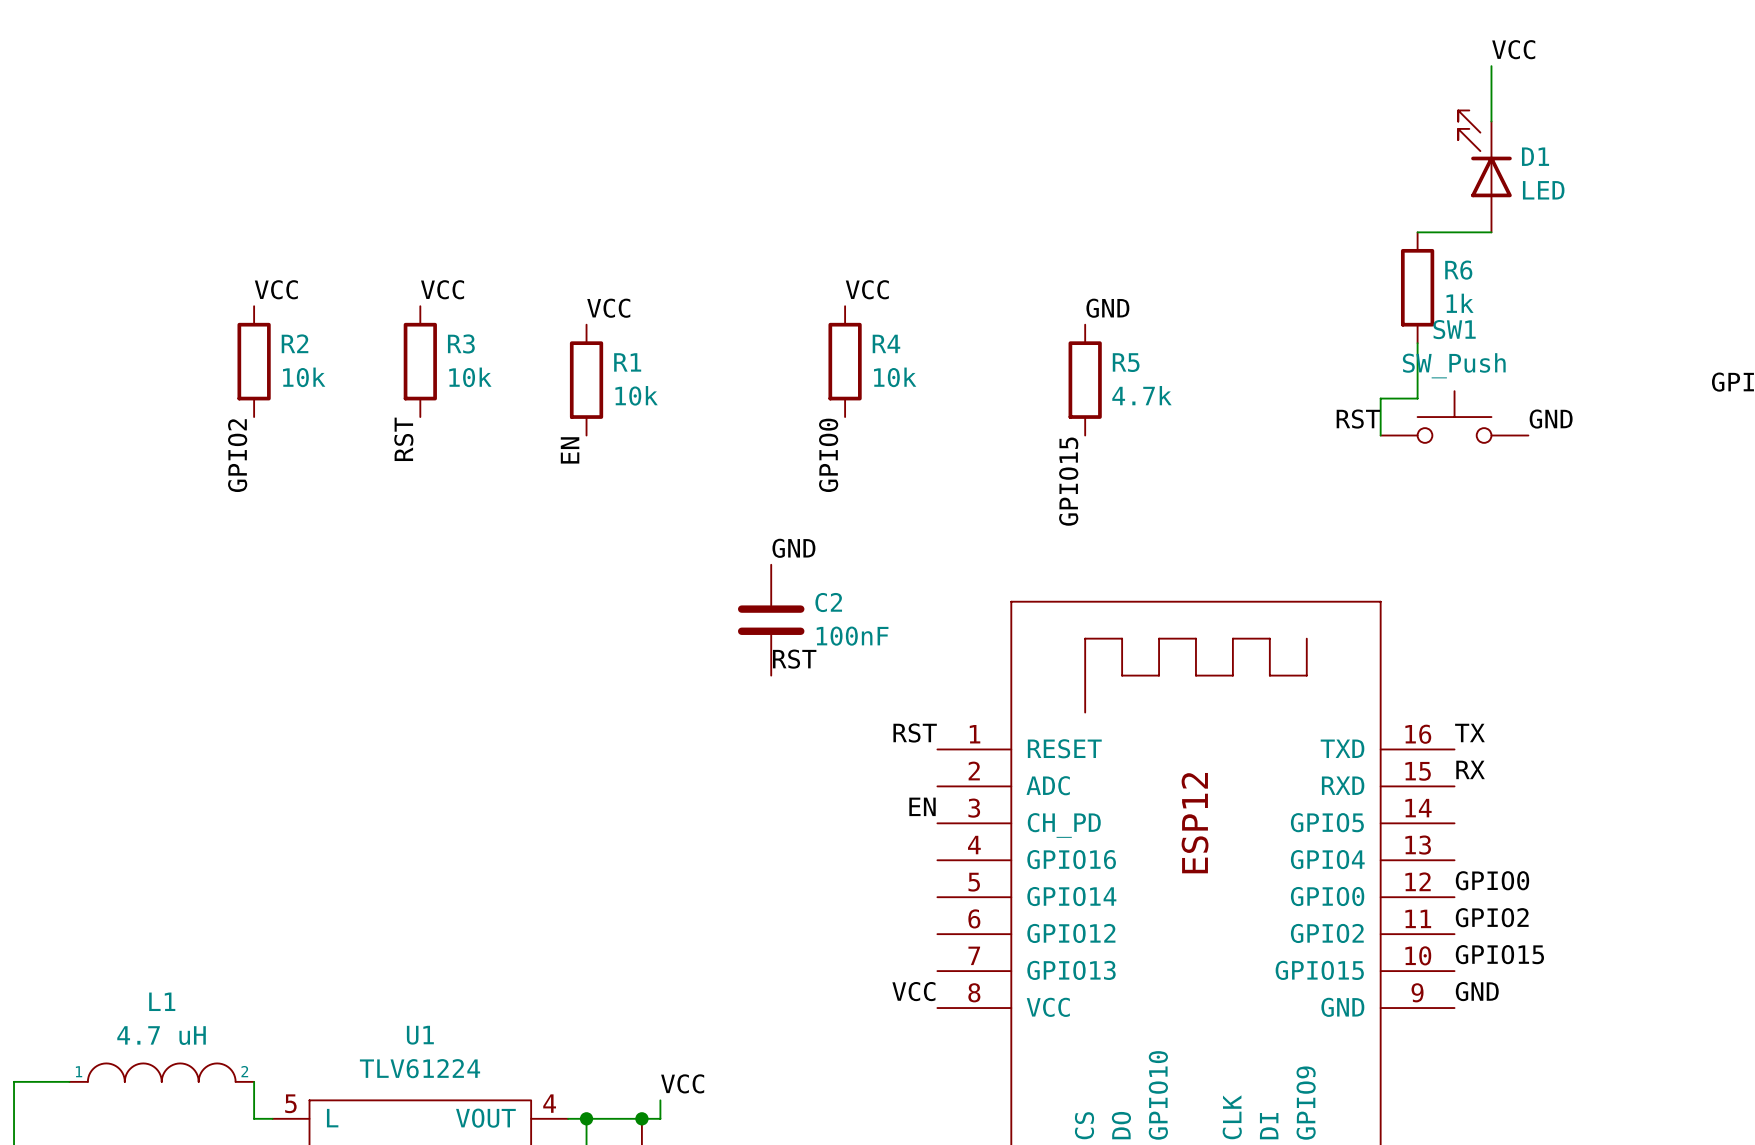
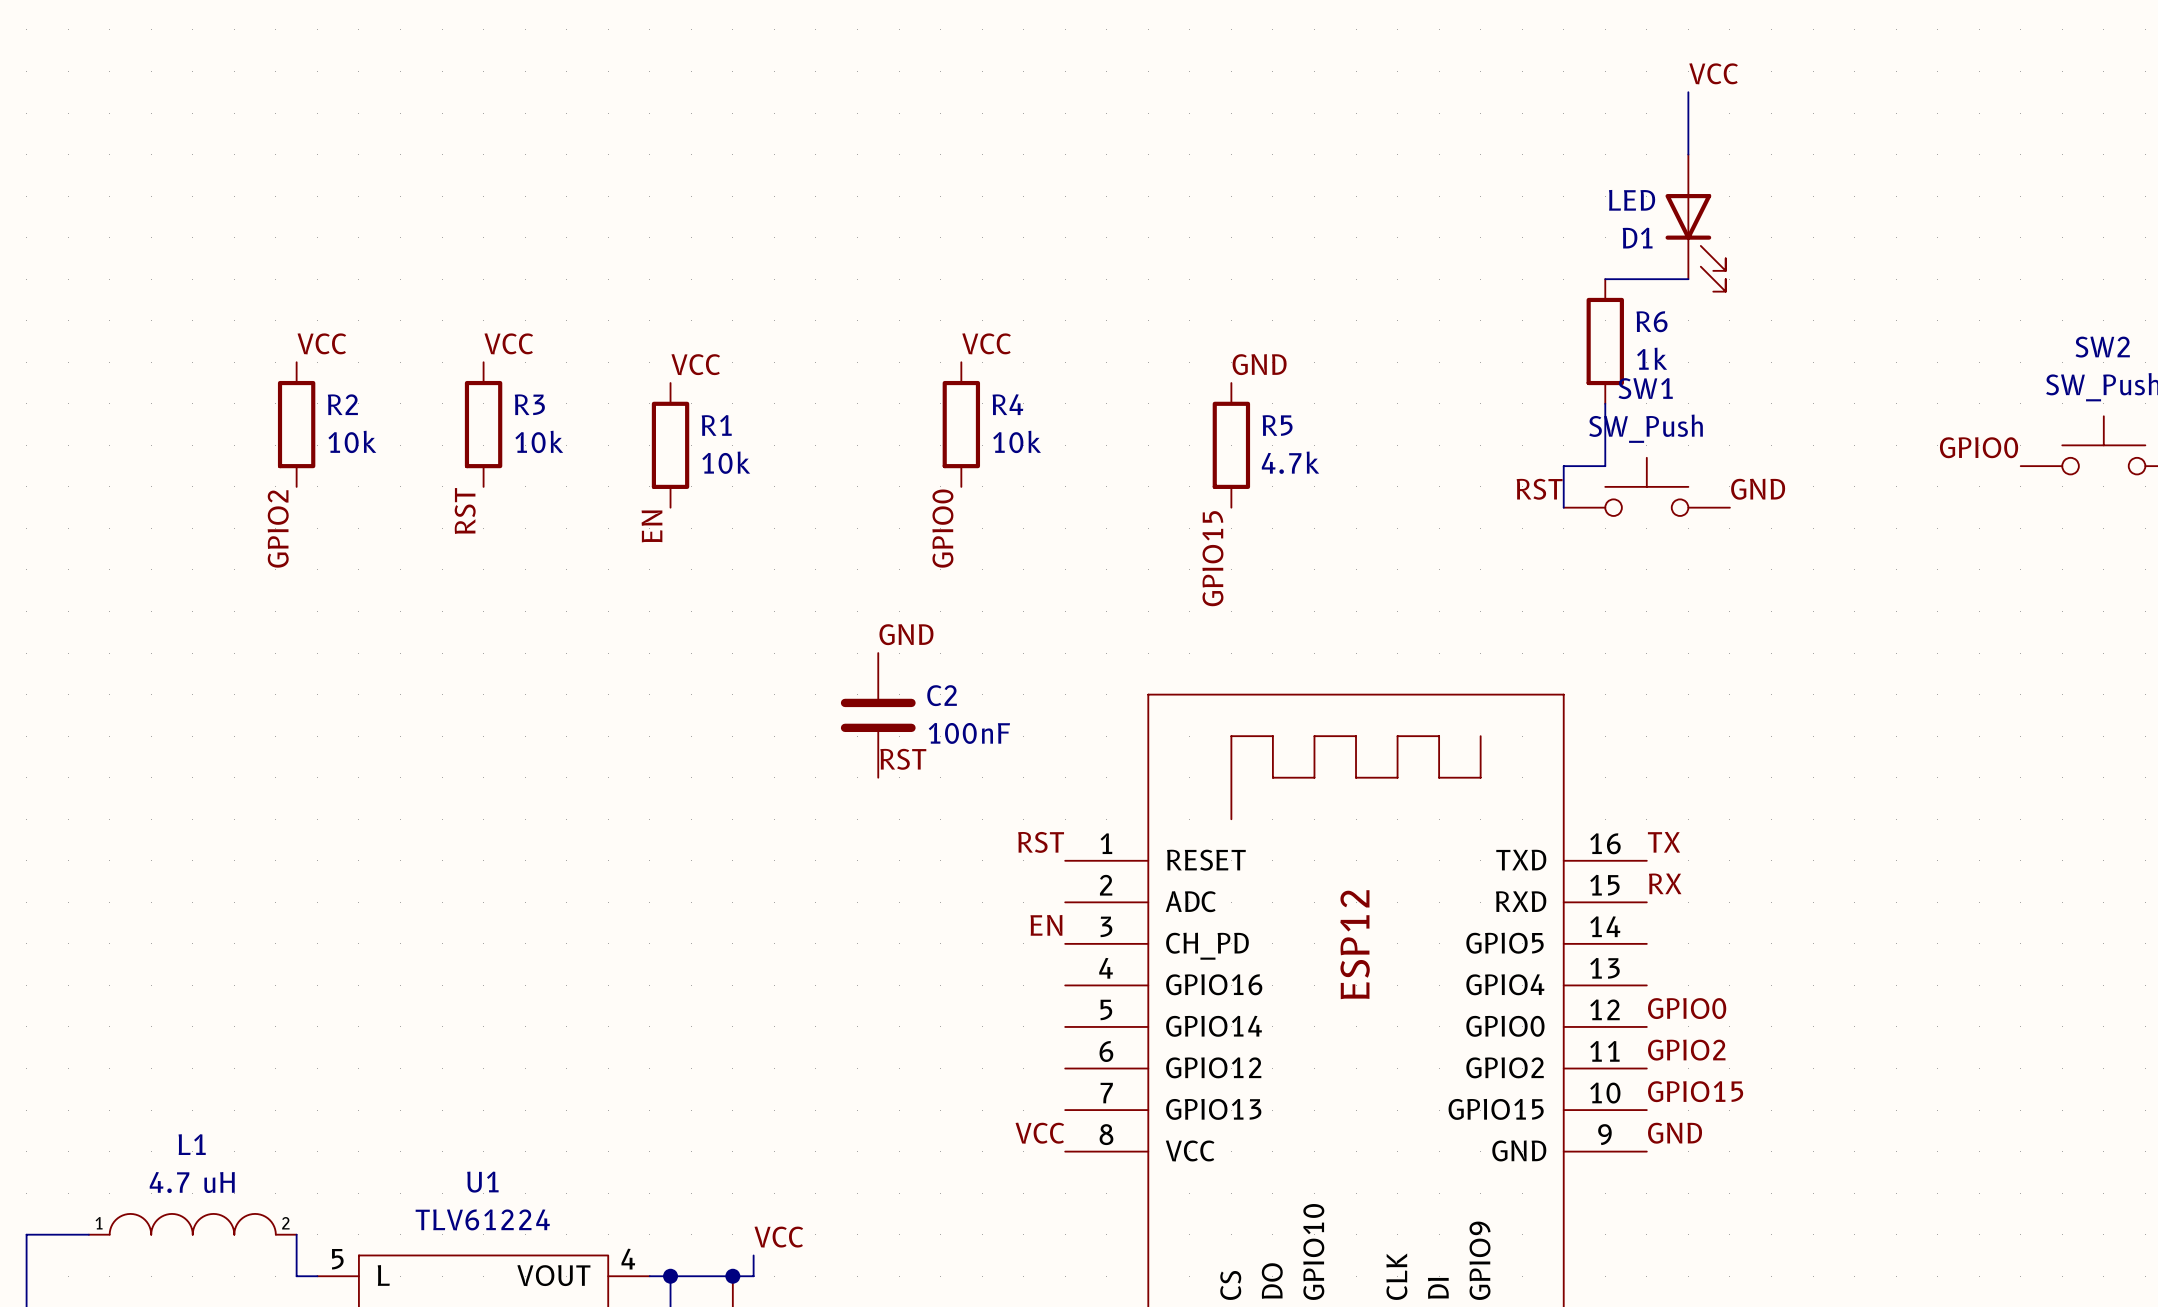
D1 rotation: 0° (1485, 153) -> 180° (1695, 242)

